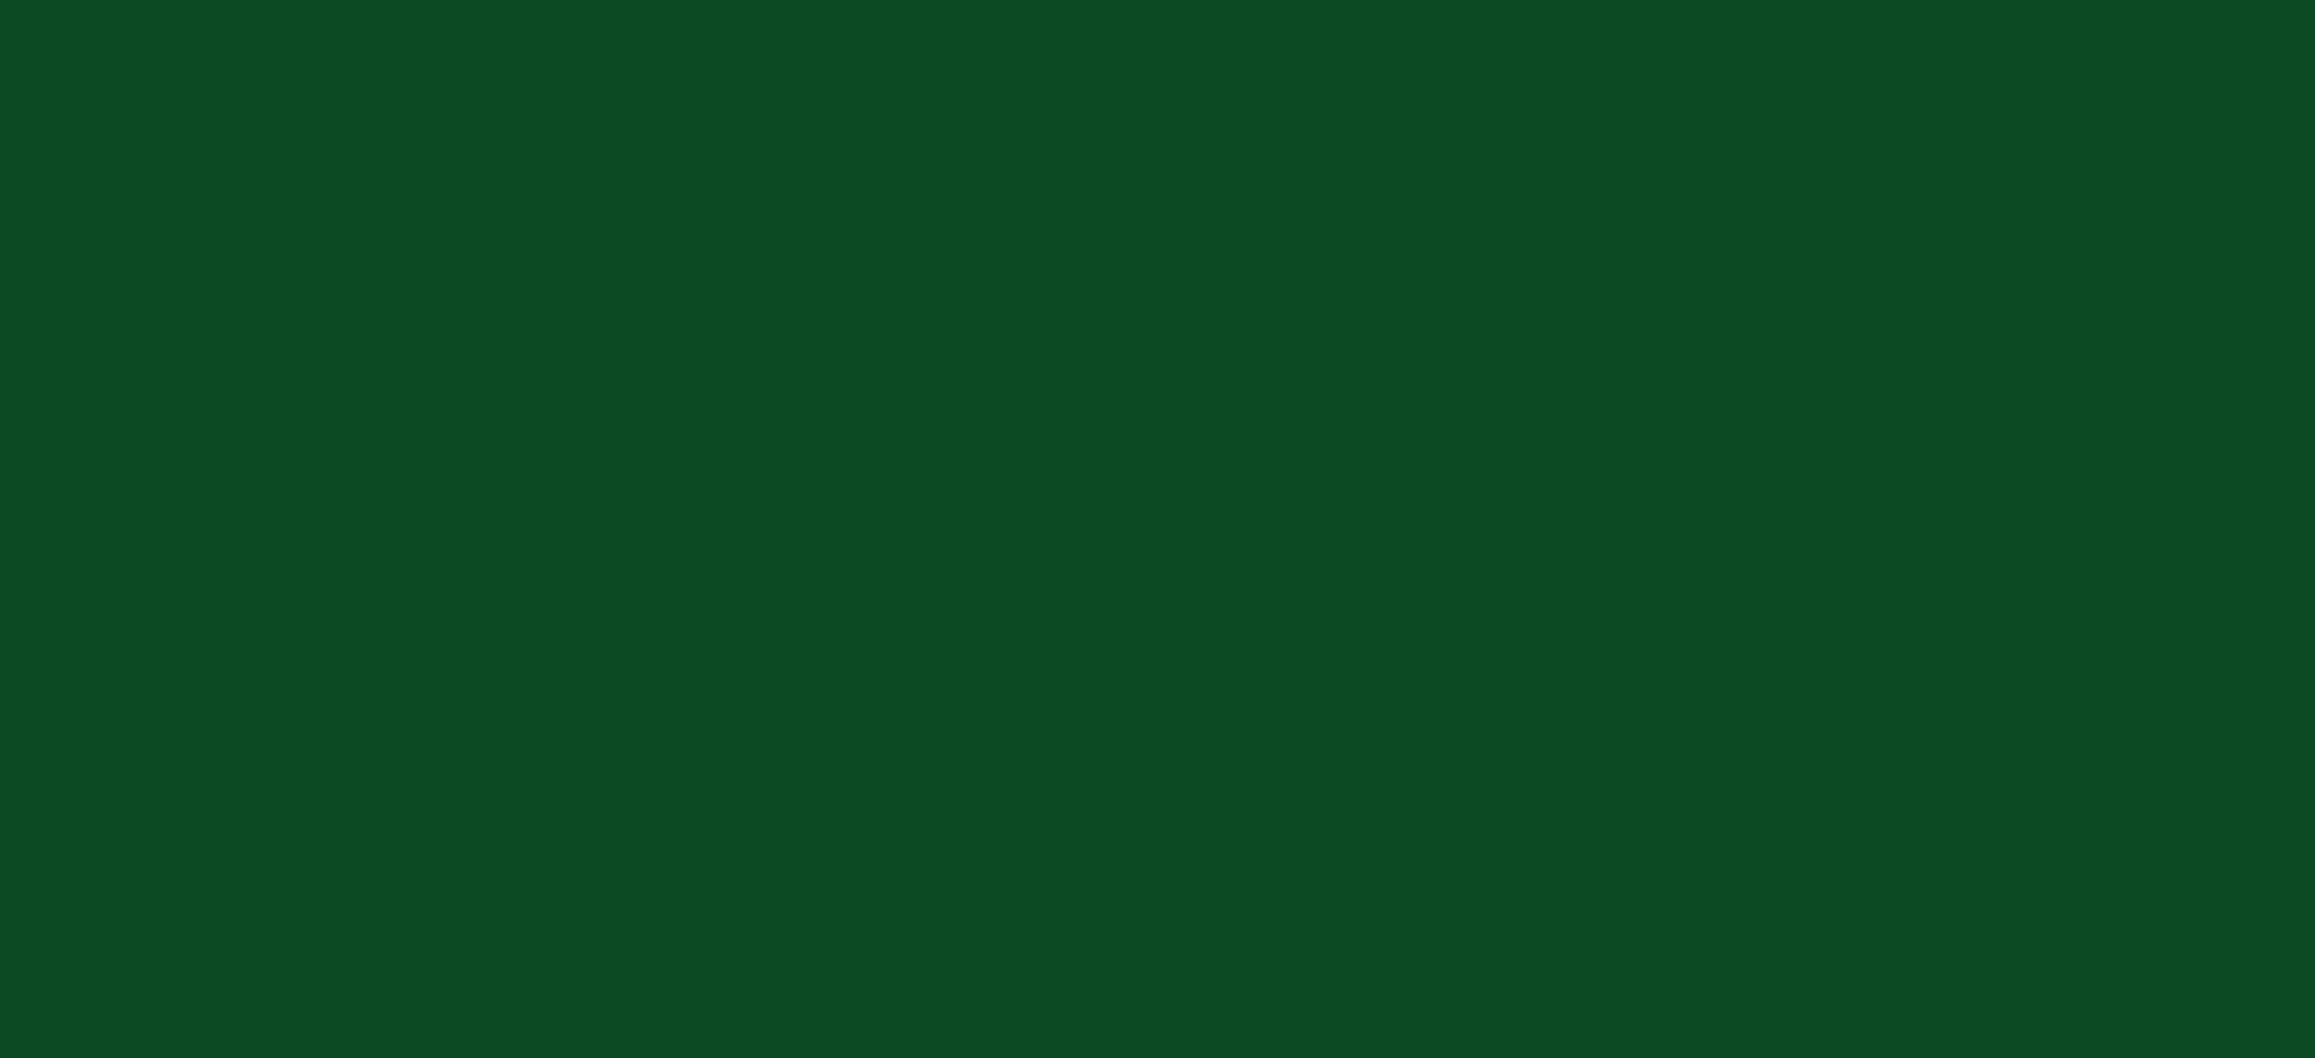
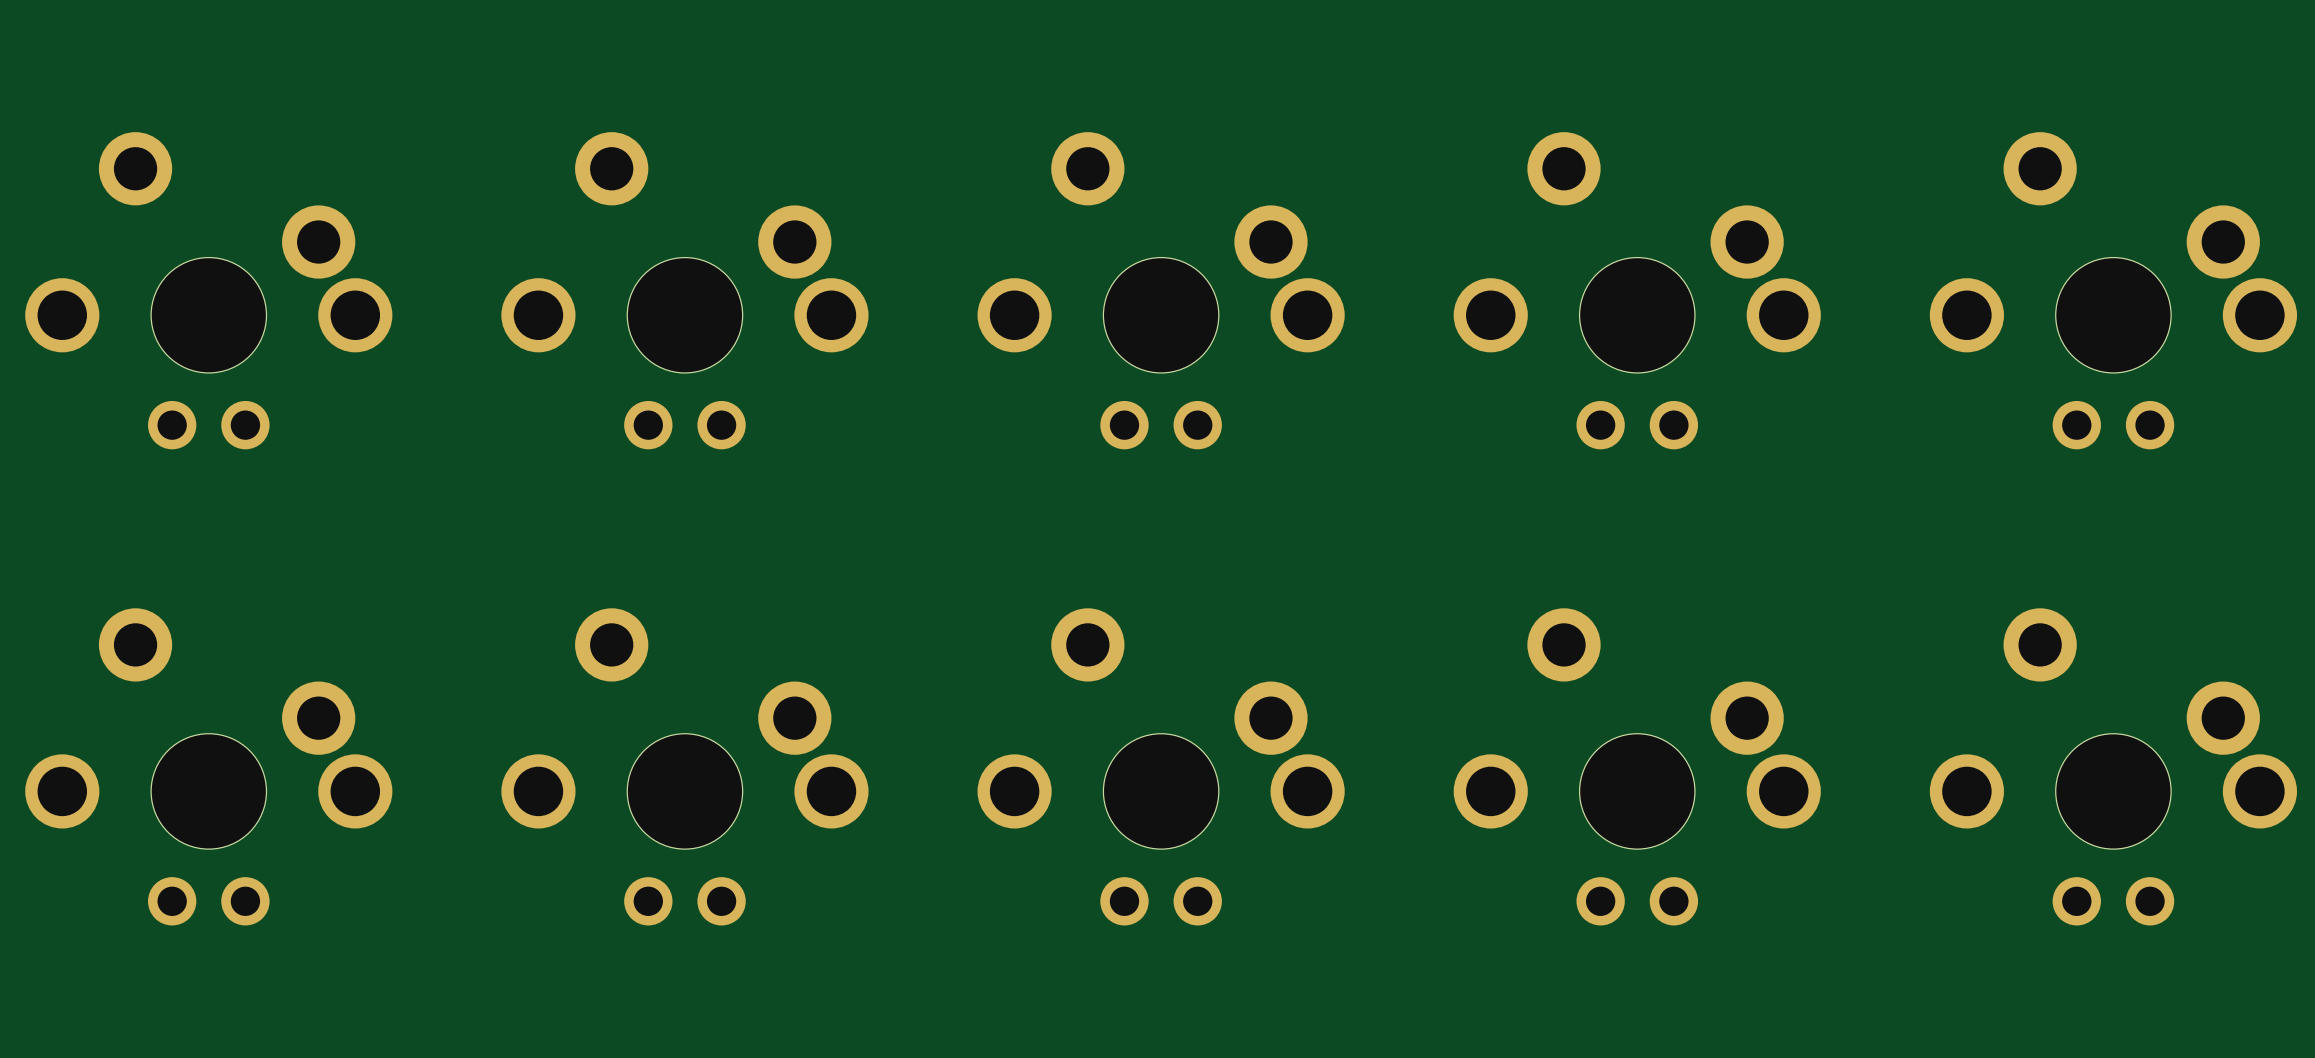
part: none -> (208, 290)
part: none -> (684, 290)
part: none -> (1161, 290)
part: none -> (1637, 290)
part: none -> (2113, 290)
part: none -> (208, 766)
part: none -> (684, 766)
part: none -> (1161, 766)
part: none -> (1637, 766)
part: none -> (2113, 766)

